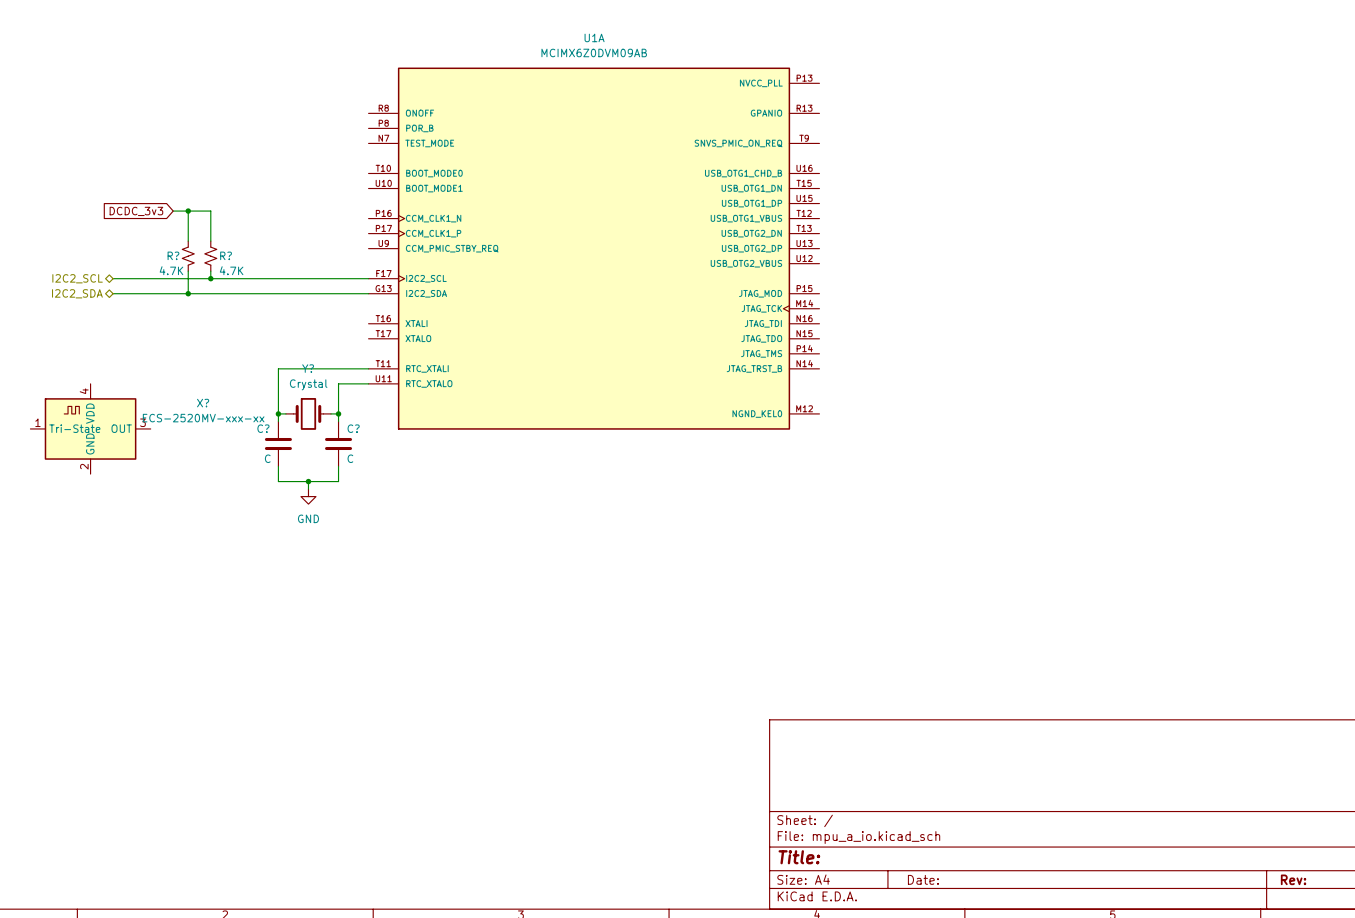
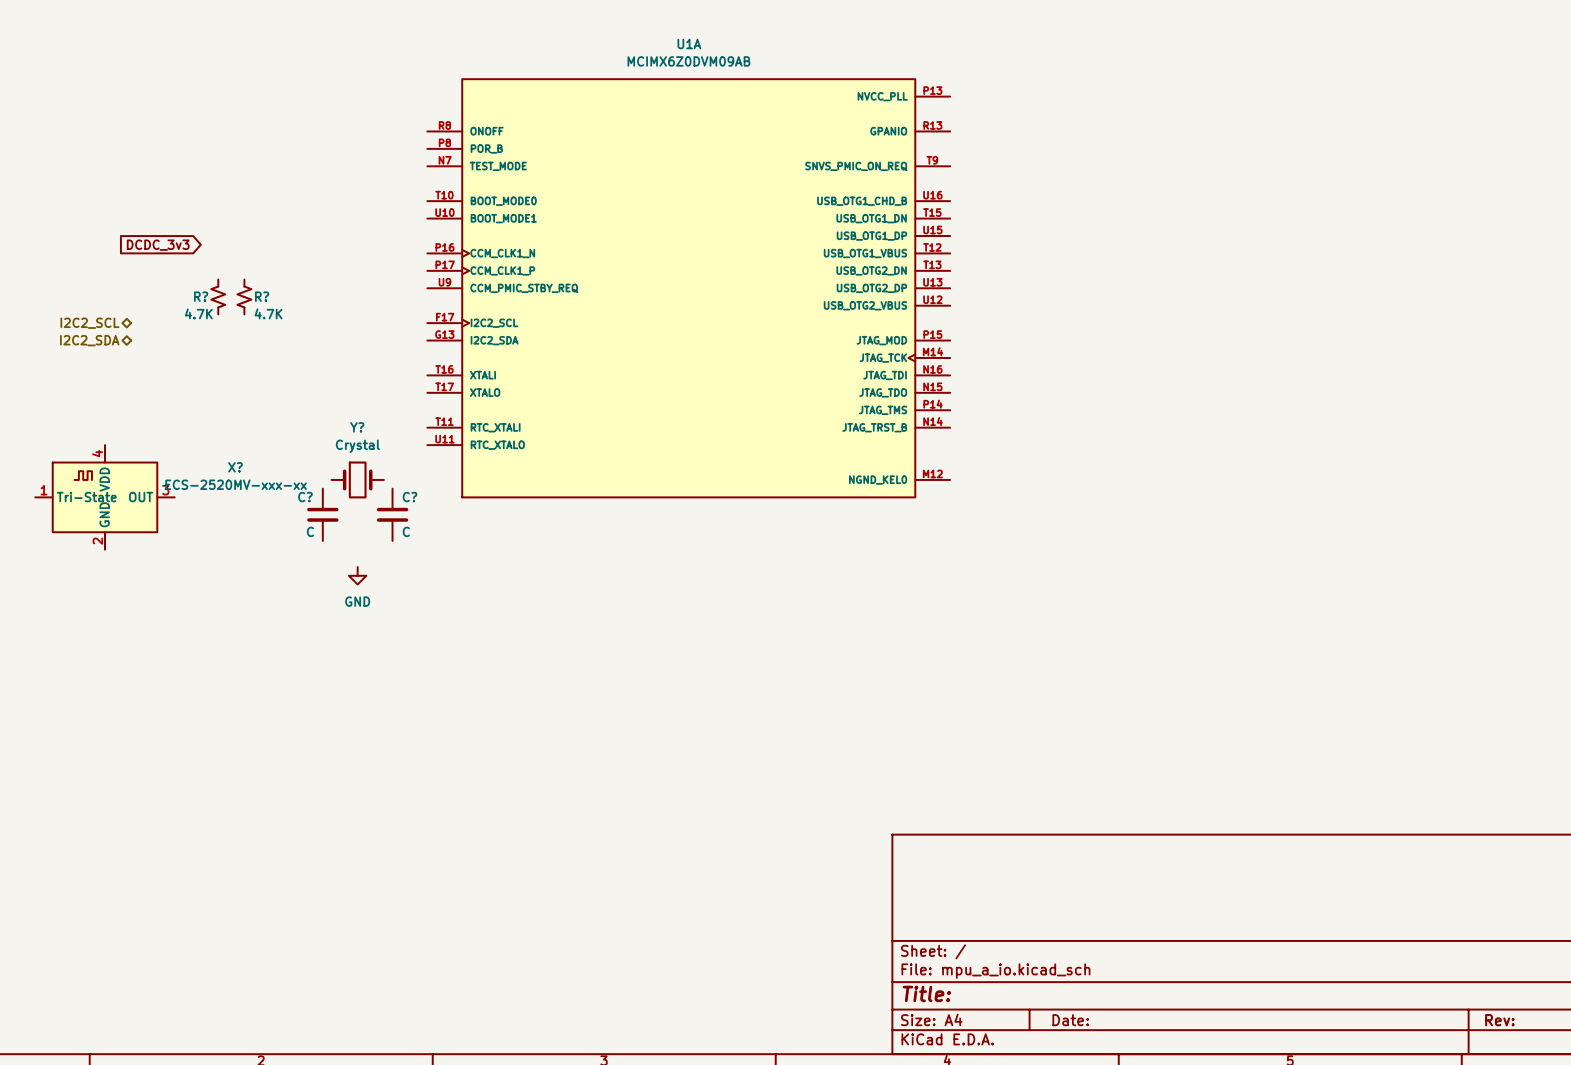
wire: (173, 211) (210, 211) (210, 241) -> none
wire: (188, 211) (188, 241) -> none
junction: (188, 211) -> none
wire: (188, 271) (188, 293) -> none
wire: (210, 271) (210, 278) -> none
wire: (113, 278) (368, 278) -> none
junction: (210, 278) -> none
wire: (113, 293) (368, 293) -> none
junction: (188, 293) -> none
wire: (368, 368) (278, 368) (278, 421) -> none
wire: (368, 383) (338, 383) (338, 421) -> none
wire: (278, 413) (285, 413) -> none
junction: (278, 413) -> none
wire: (331, 413) (338, 413) -> none
junction: (338, 413) -> none
wire: (278, 466) (278, 481) (338, 481) (338, 466) -> none
wire: (308, 481) (308, 489) -> none
junction: (308, 481) -> none

